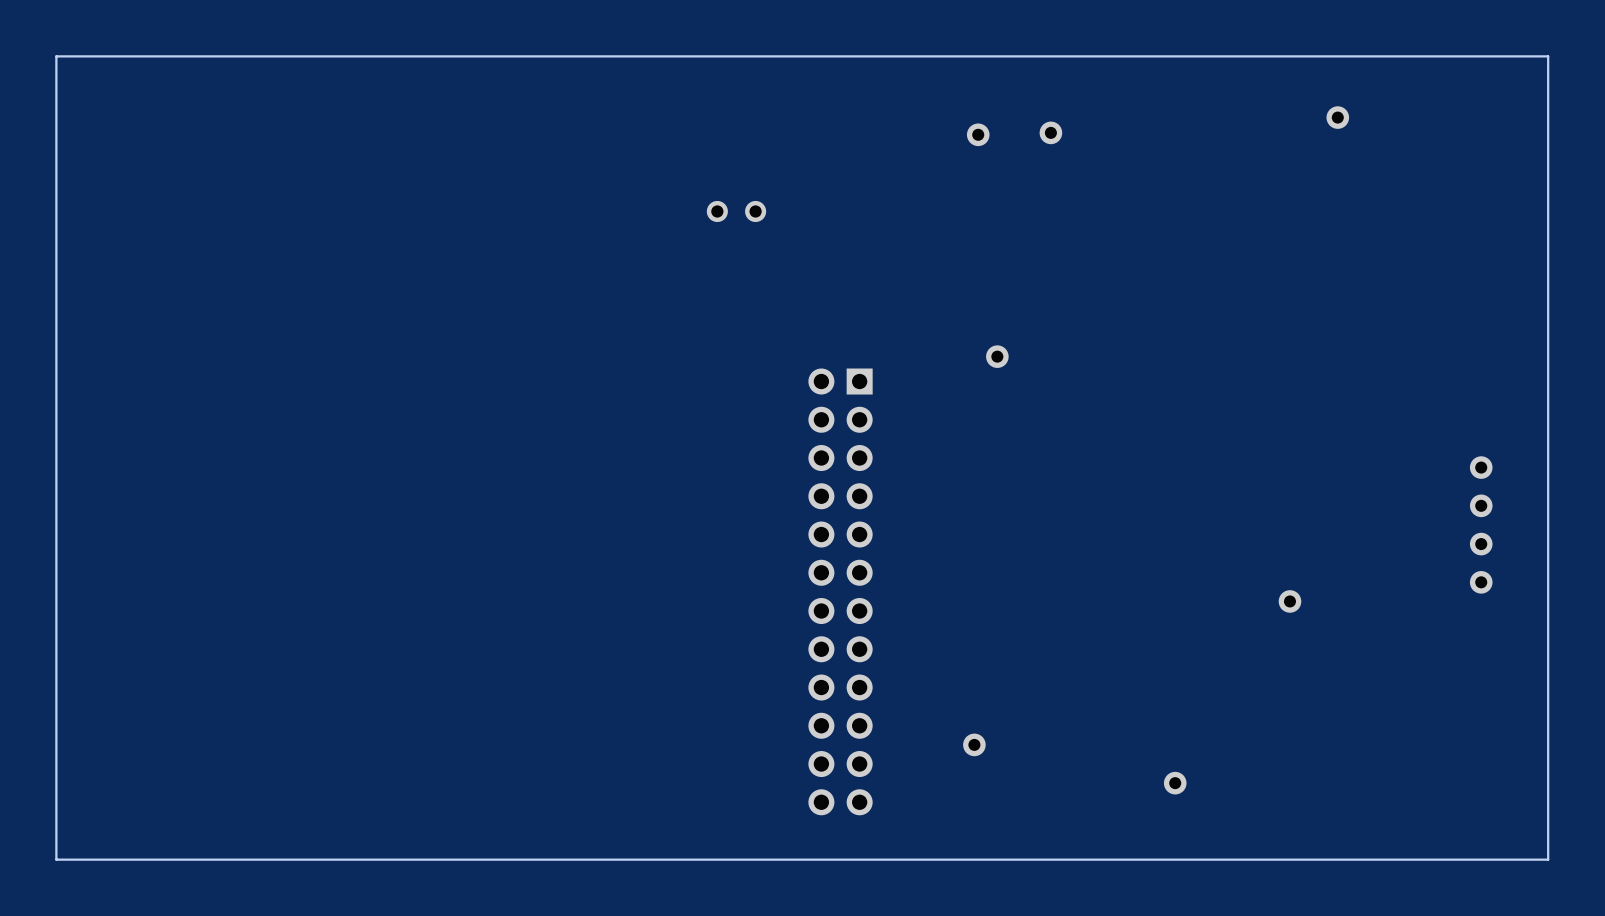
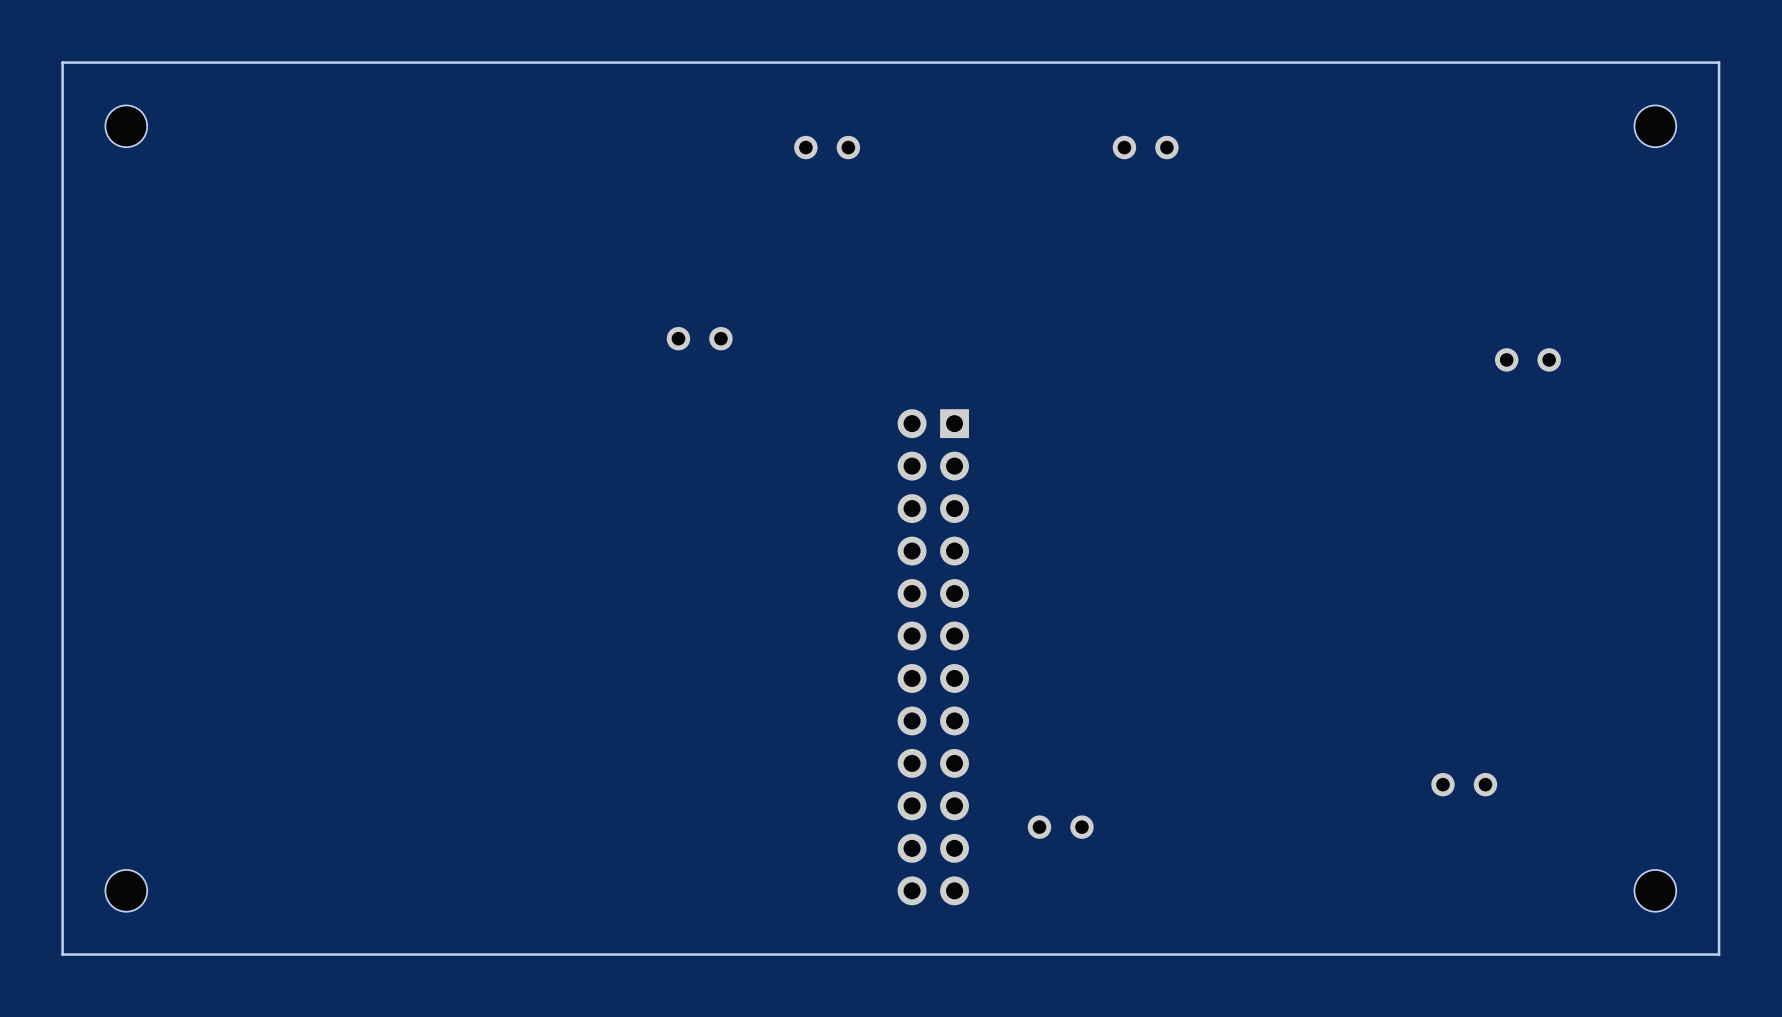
part: none -> (126, 126)
part: none -> (1655, 126)
part: (1337, 117) -> none
part: none -> (827, 147)
part: none -> (1145, 147)
part: (1050, 132) -> none
part: (978, 134) -> none
part: (736, 211) -> none
part: none -> (699, 338)
part: none -> (1527, 359)
part: (997, 356) -> none
part: (1481, 467) -> none
part: (1481, 505) -> none
part: (1481, 544) -> none
part: (1481, 582) -> none
part: (1289, 601) -> none
part: none -> (1464, 784)
part: none -> (1060, 827)
part: (974, 744) -> none
part: (1175, 783) -> none
part: none -> (126, 890)
part: none -> (1655, 890)

